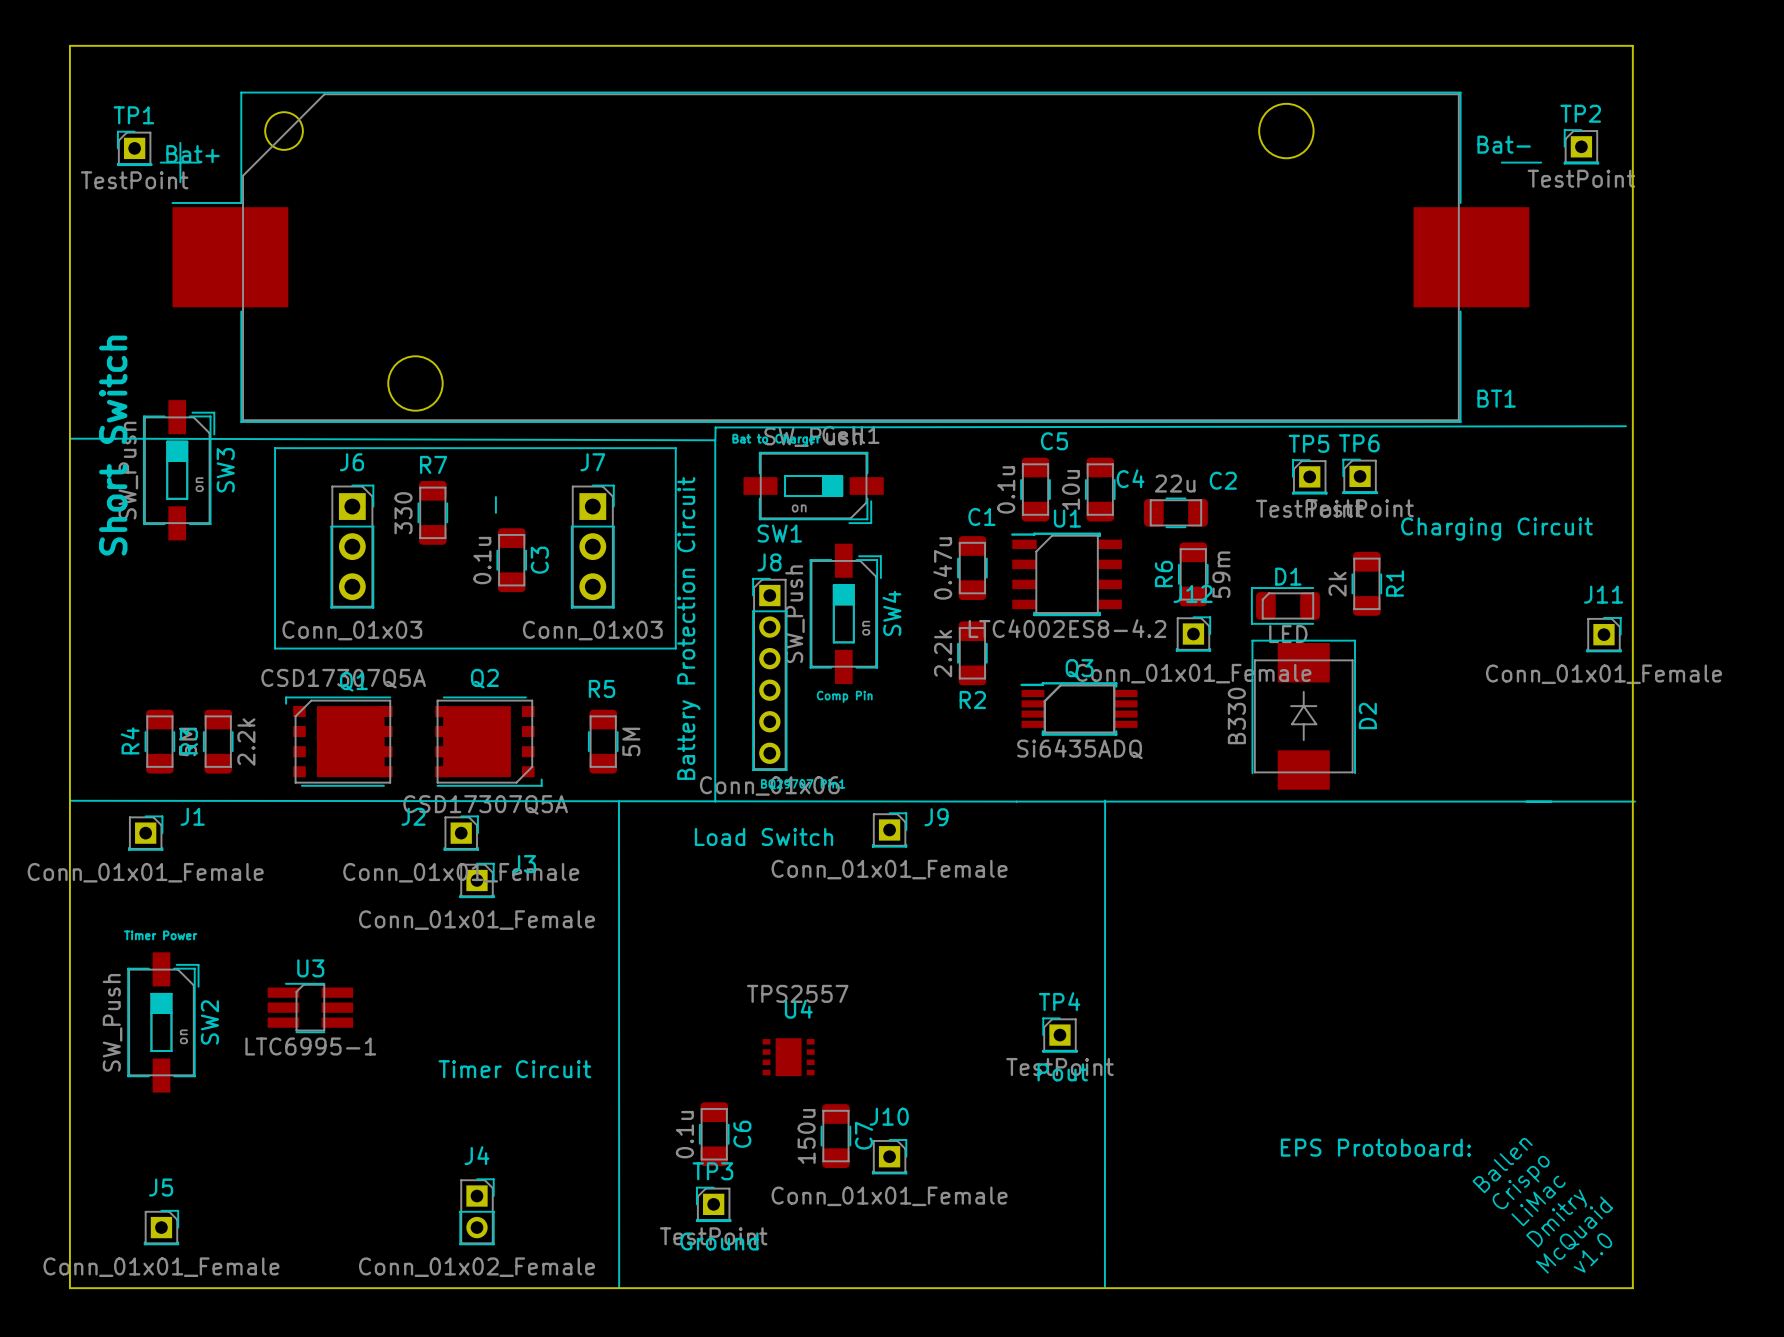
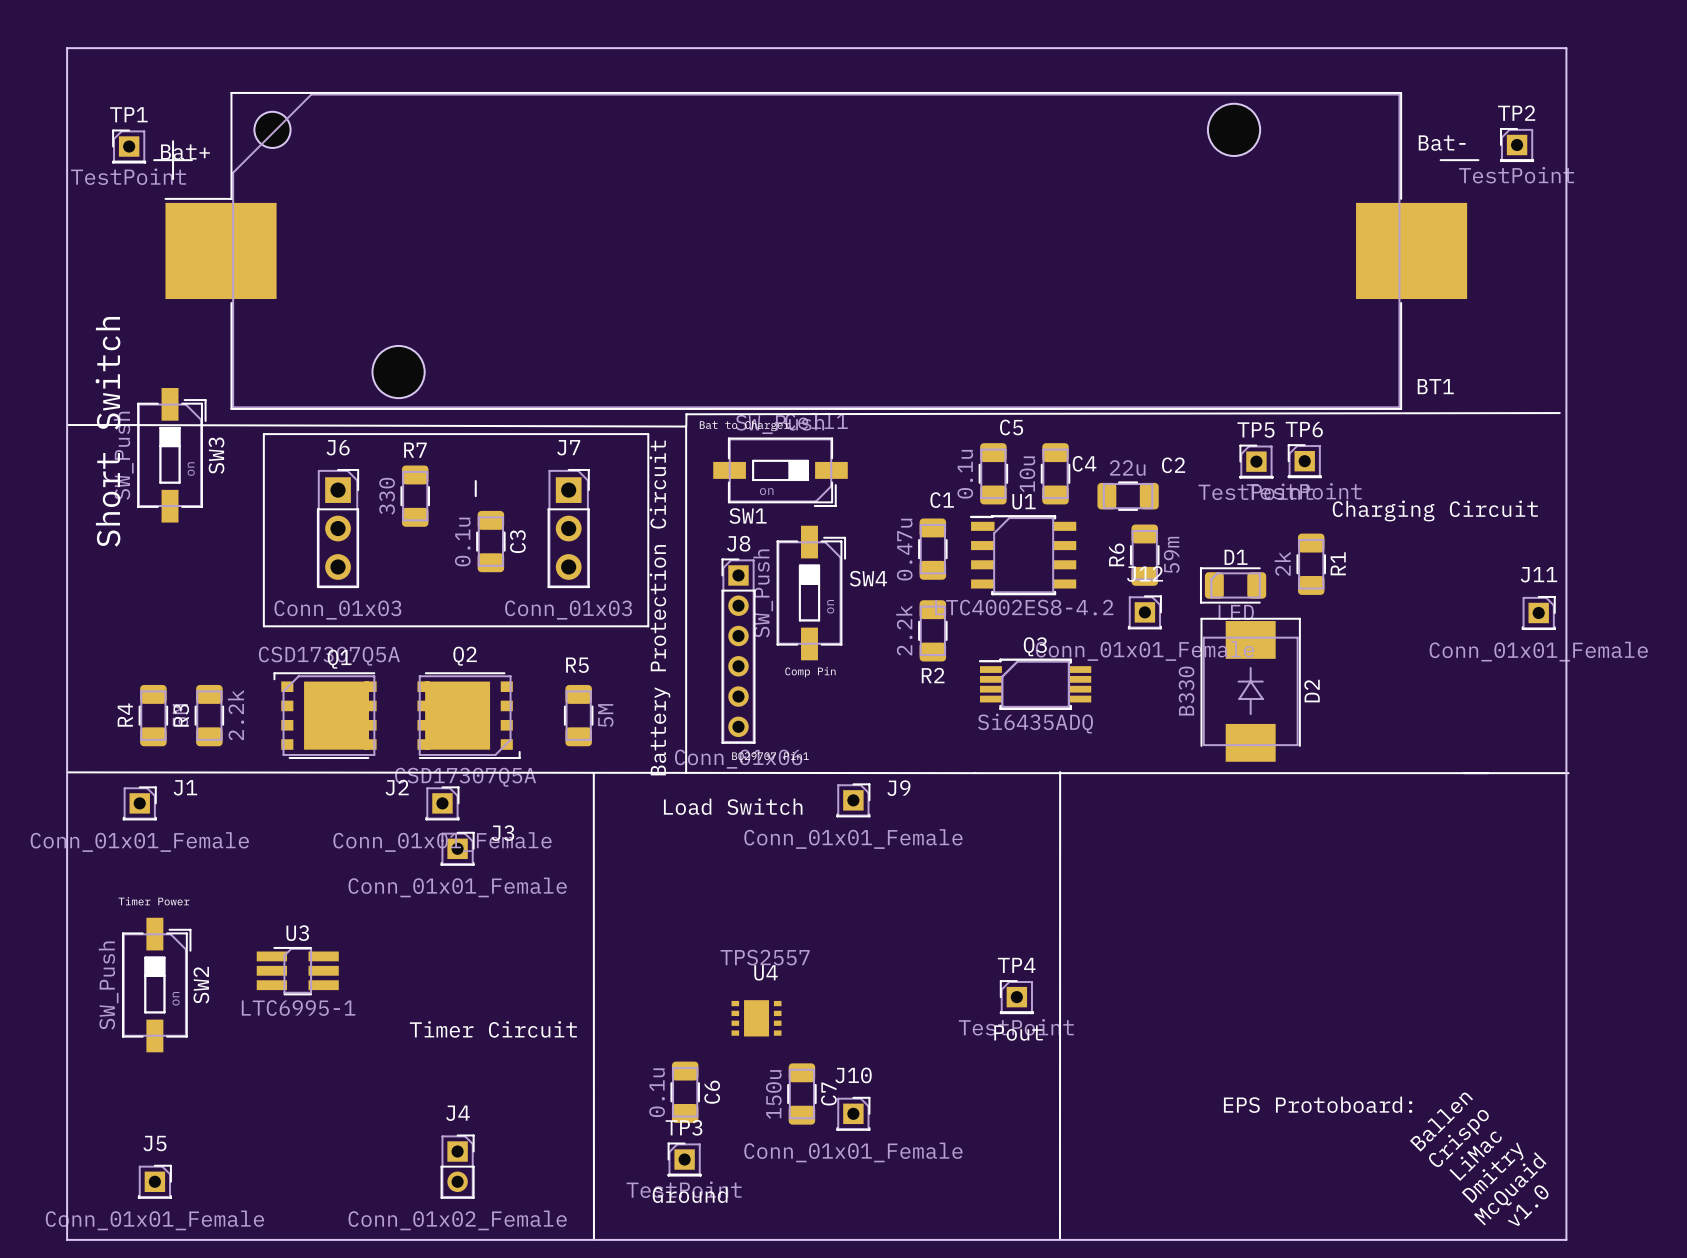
SW4 name rotation: 0° (891, 613) -> 90° clockwise (868, 578)

